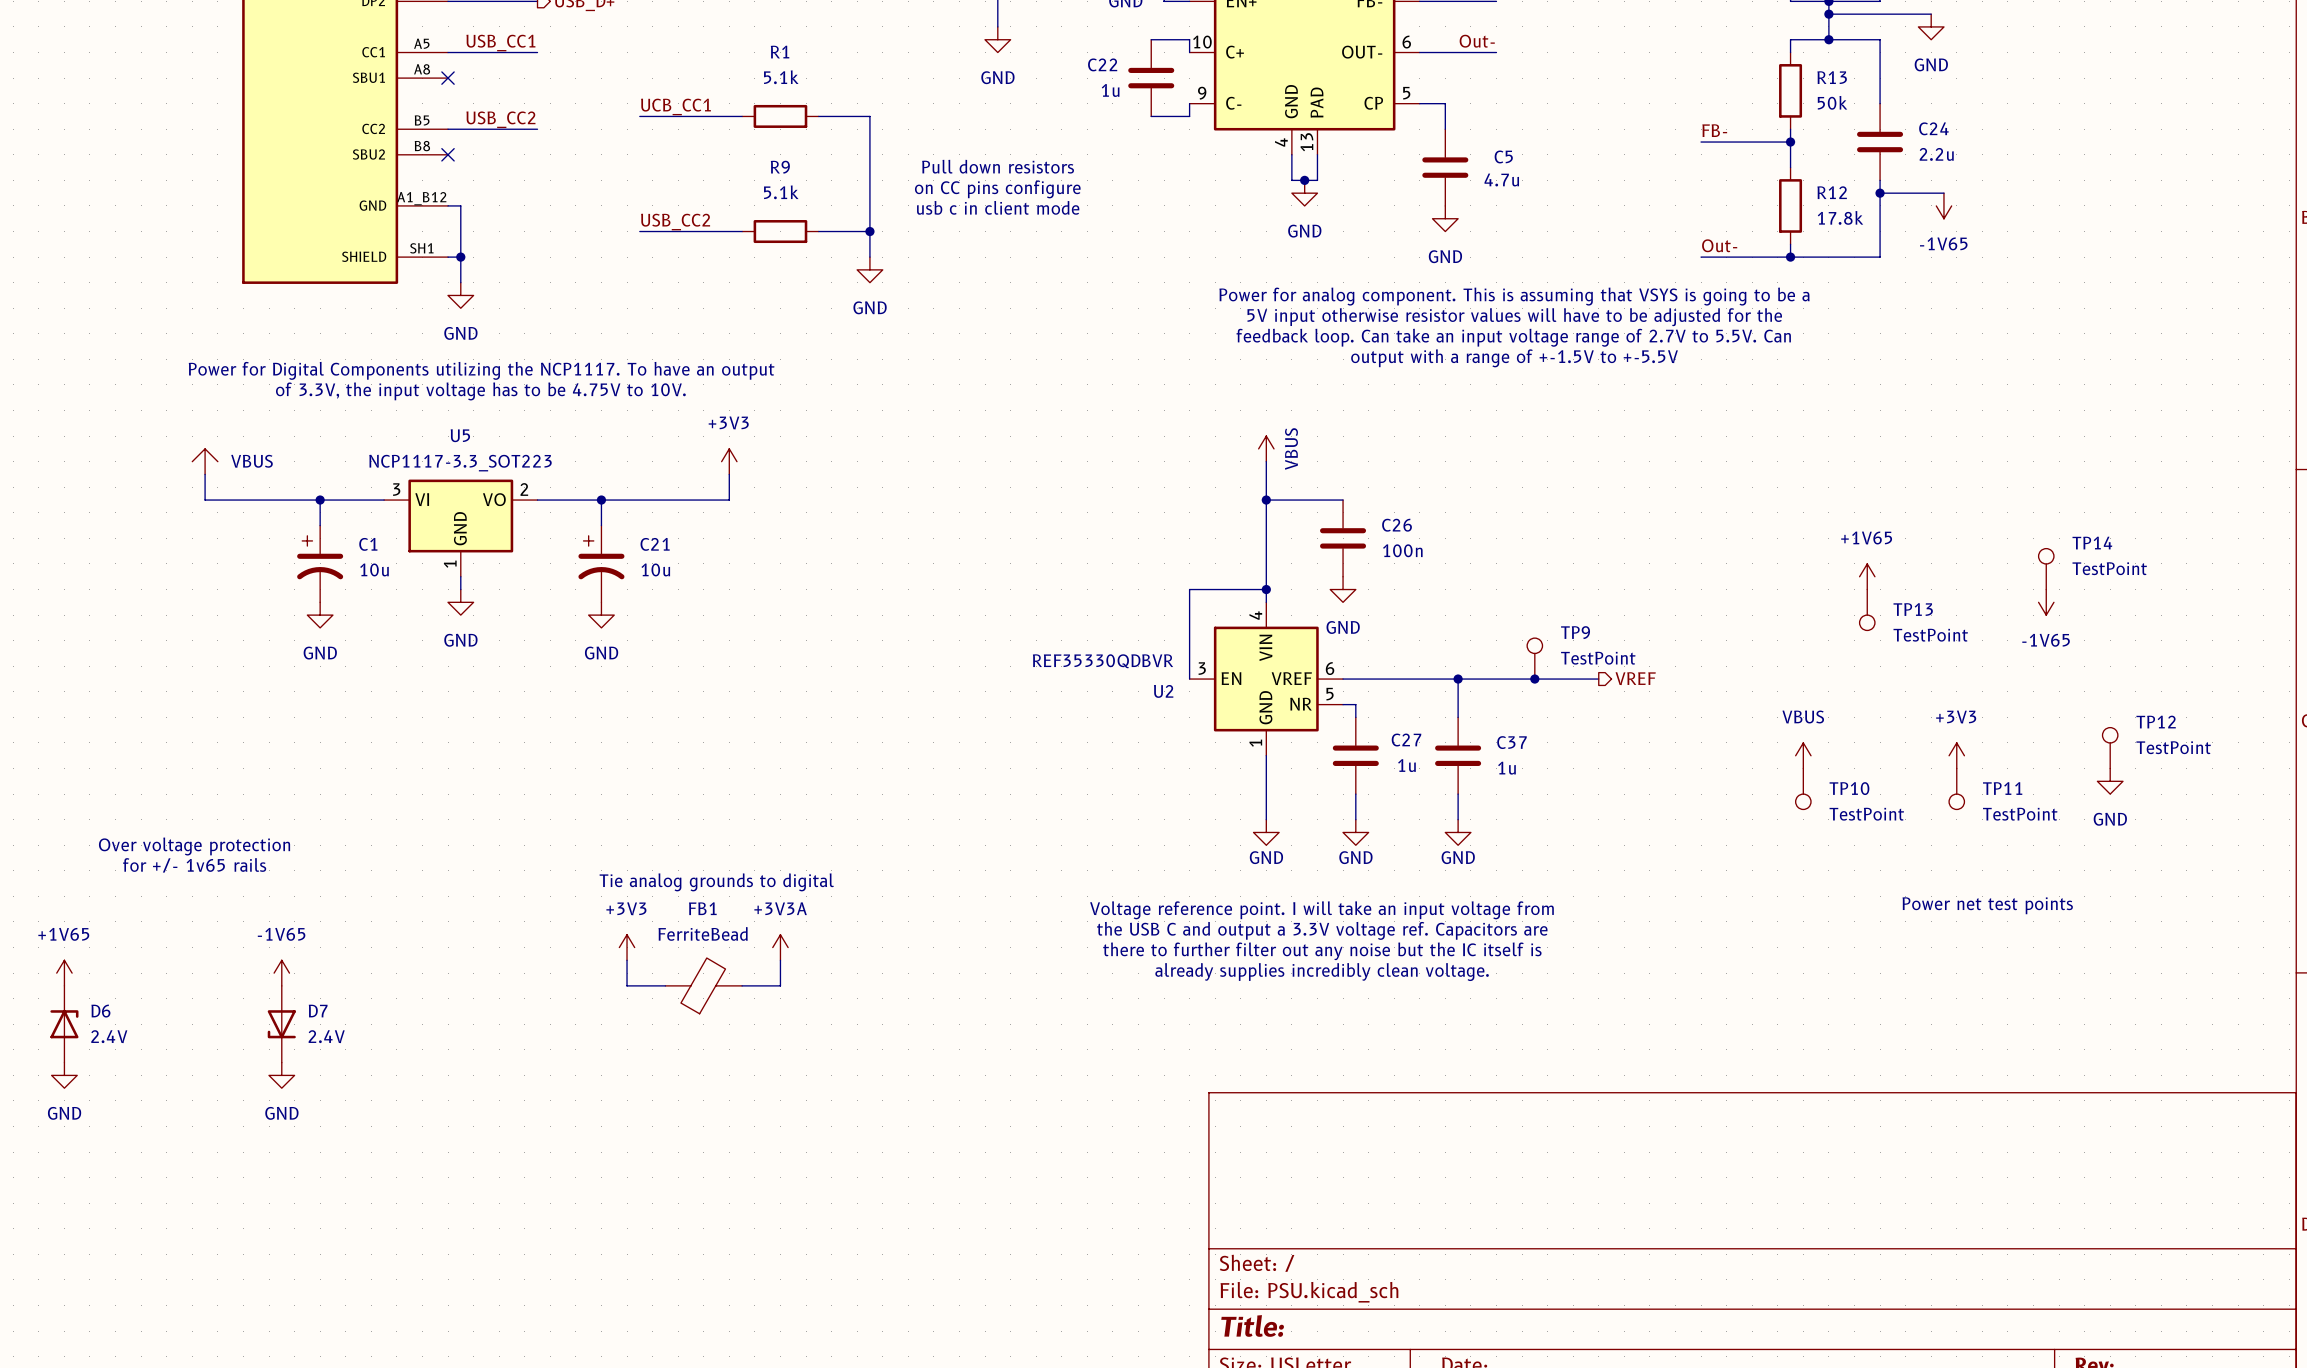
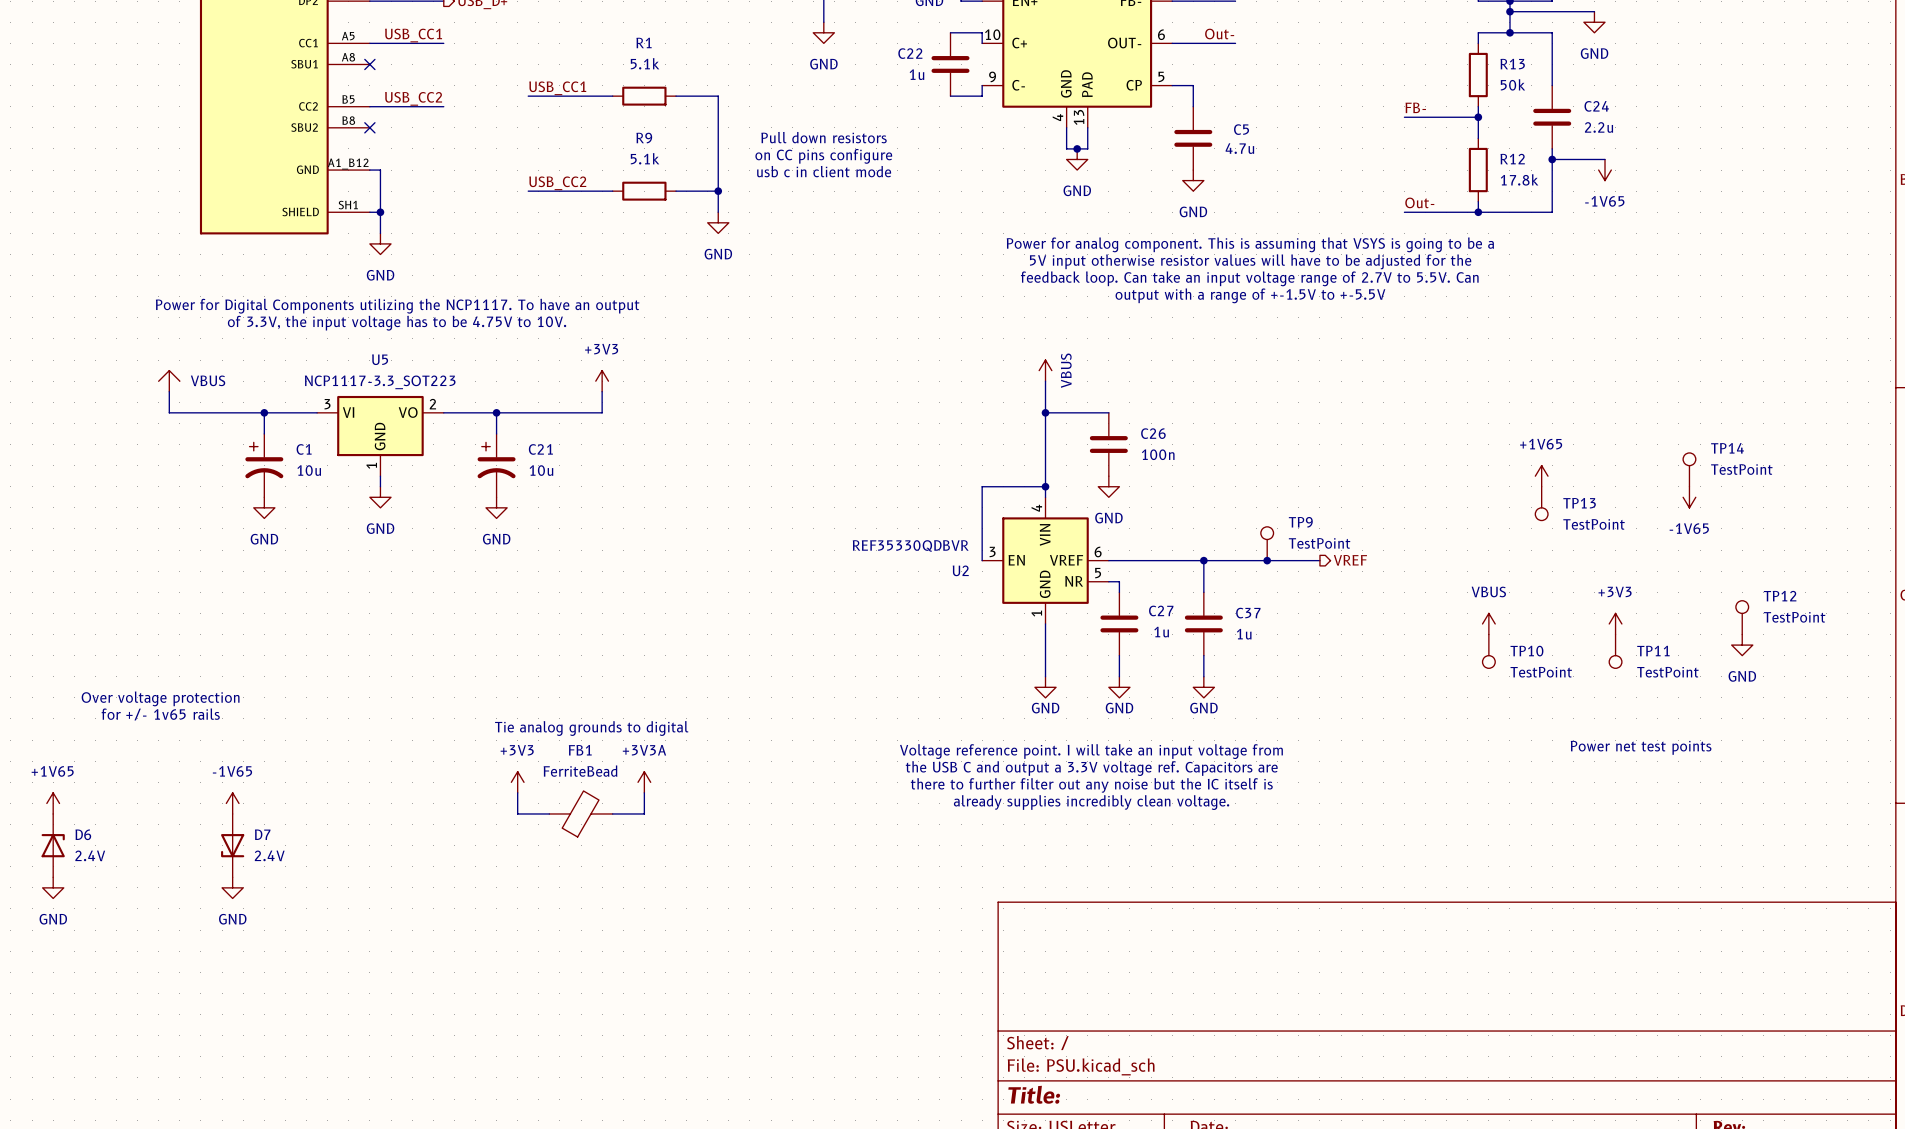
label: UCB_CC1 (675, 106) -> USB_CC1 (557, 88)

